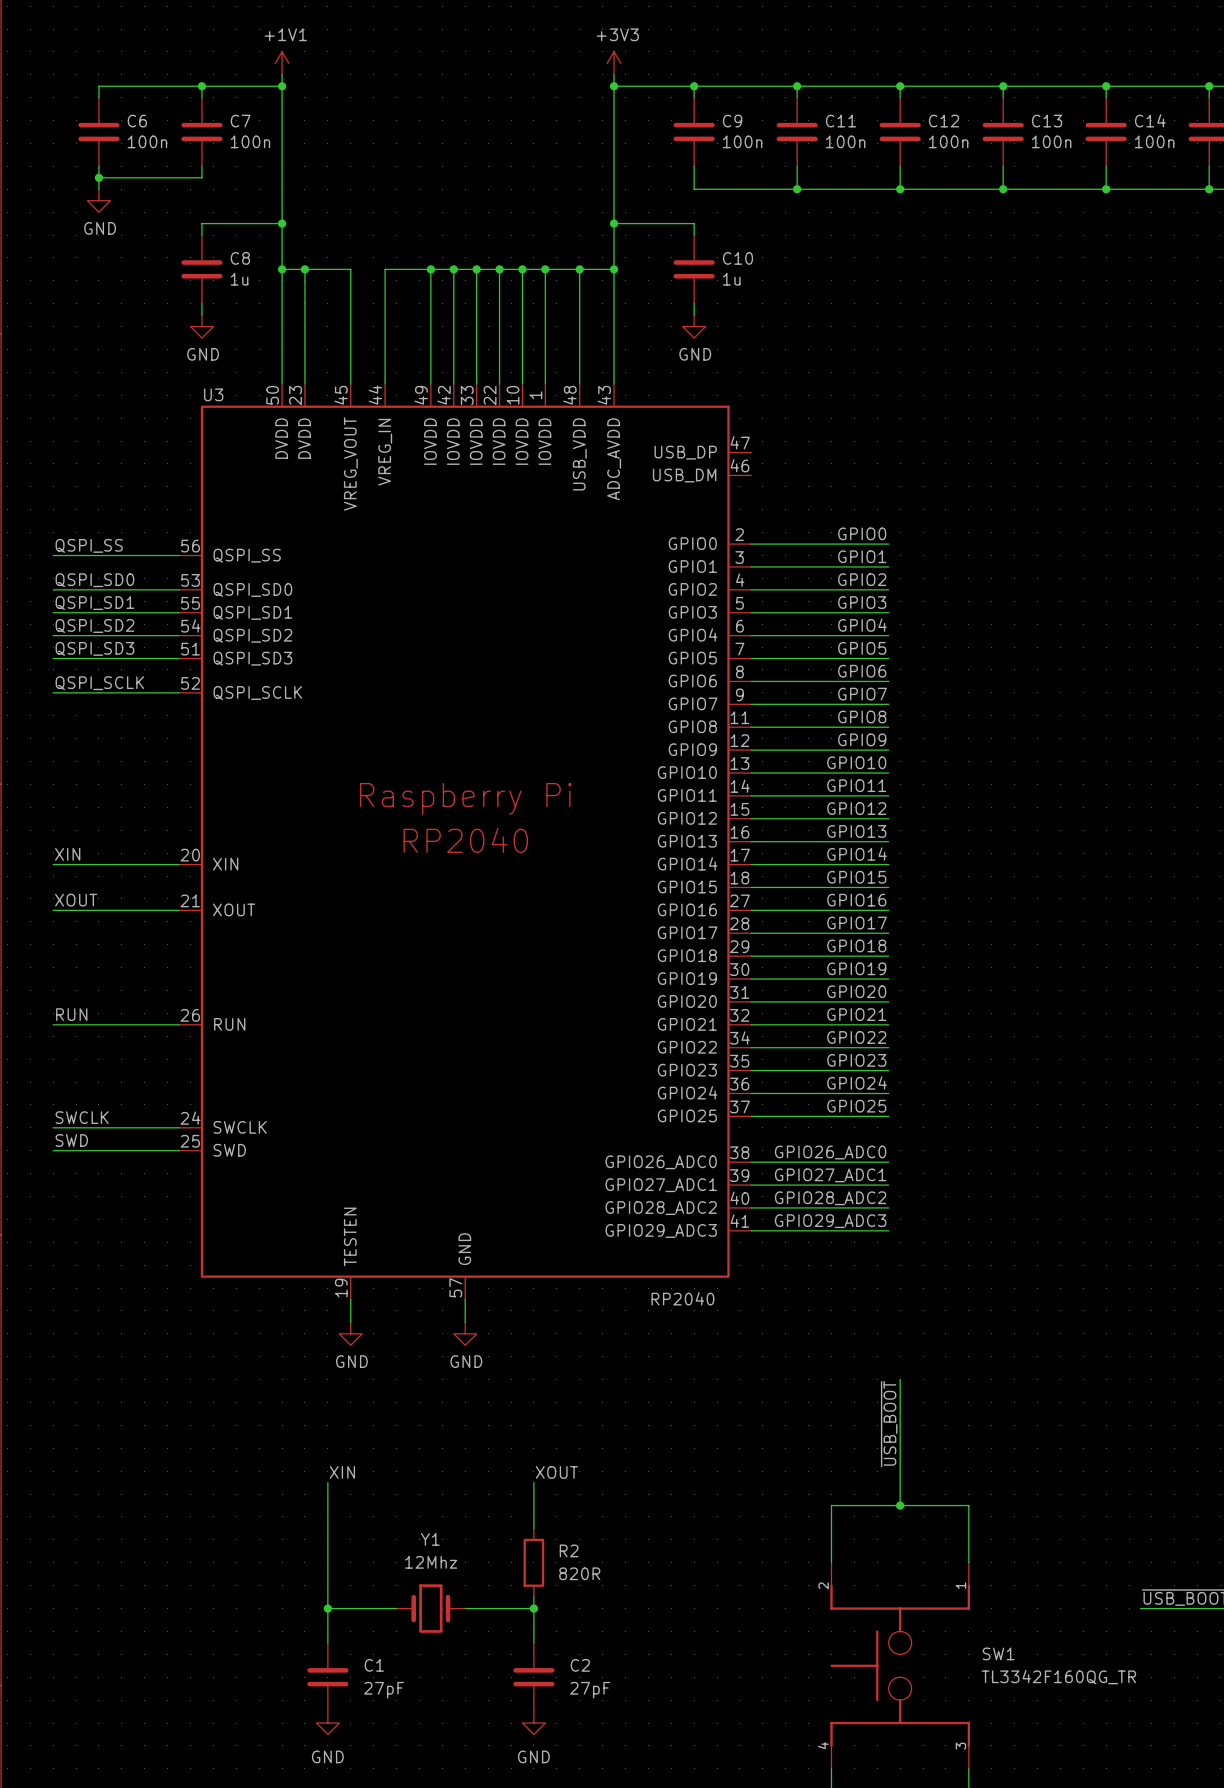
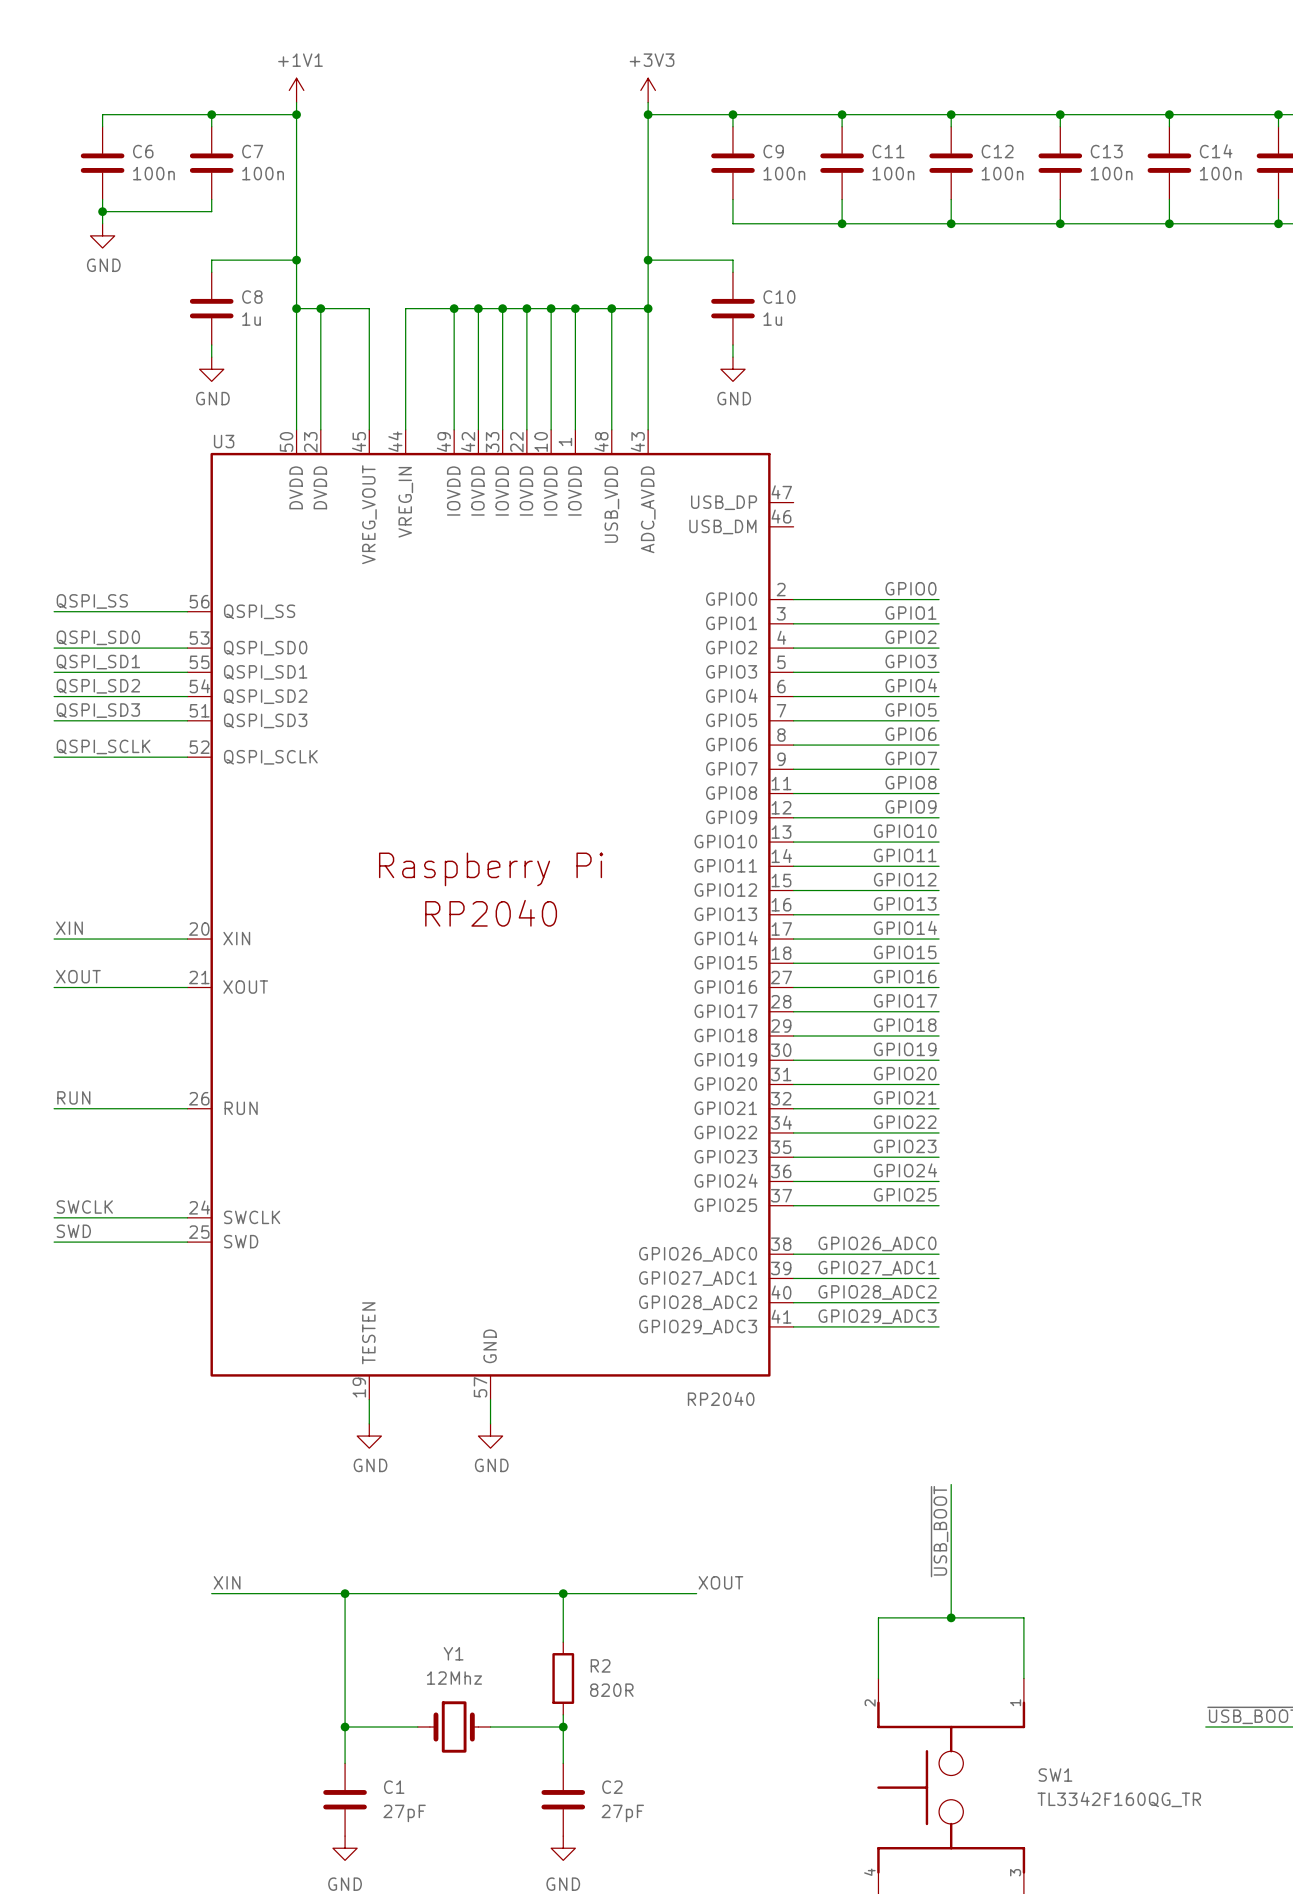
label position: XIN (342, 1472) -> XIN (227, 1582)
label position: XOUT (556, 1472) -> XOUT (720, 1582)
wire: none -> (211, 1593) (696, 1593)
junction: none -> (345, 1593)
junction: none -> (563, 1593)

